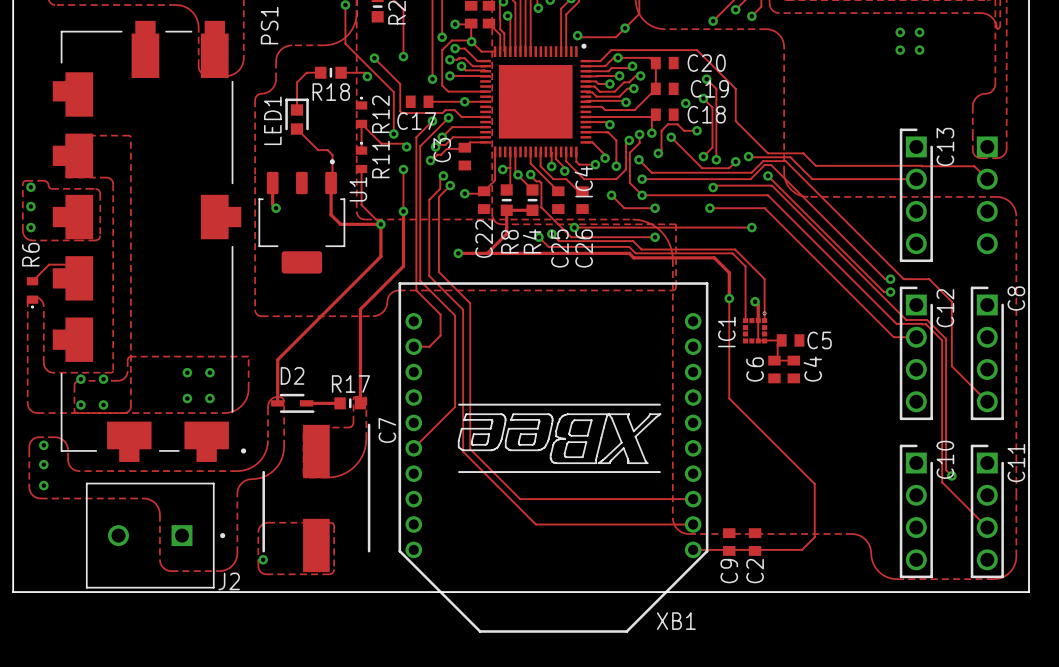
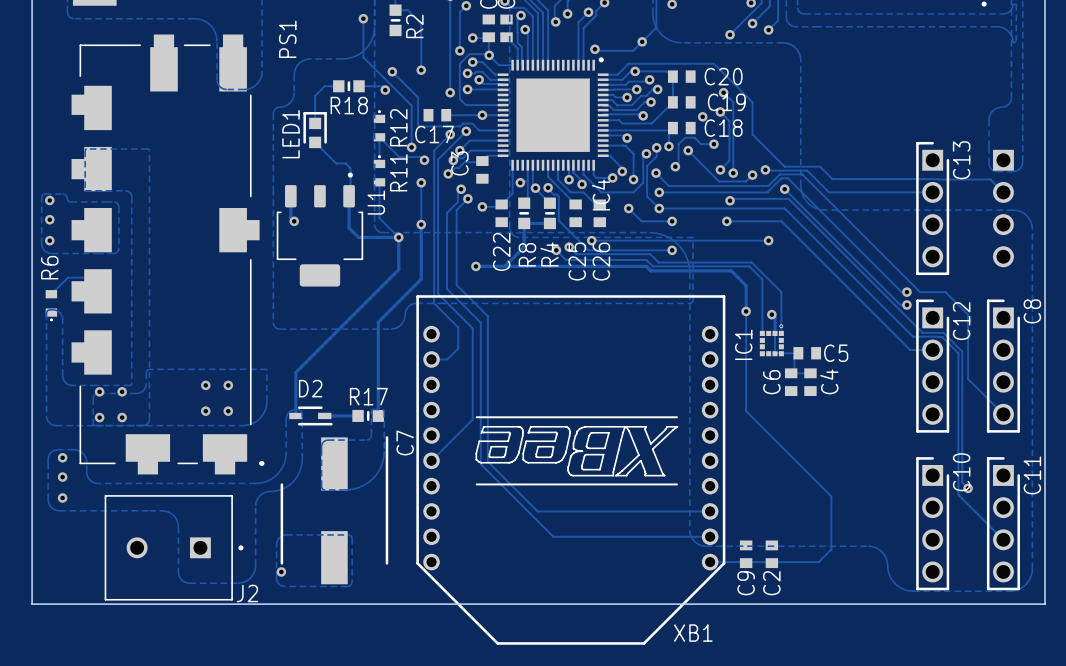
via: (900, 32) -> none
via: (919, 32) -> none
via: (900, 50) -> none
via: (919, 50) -> none

